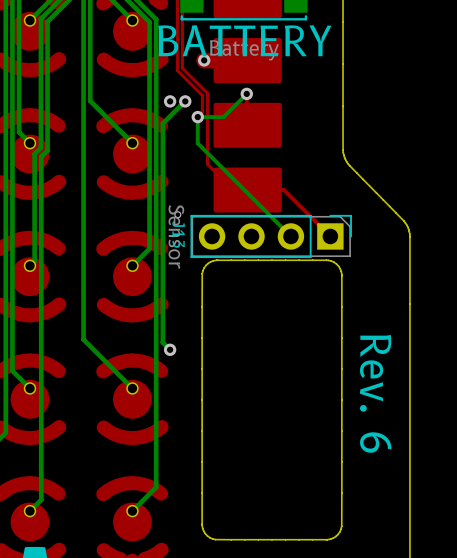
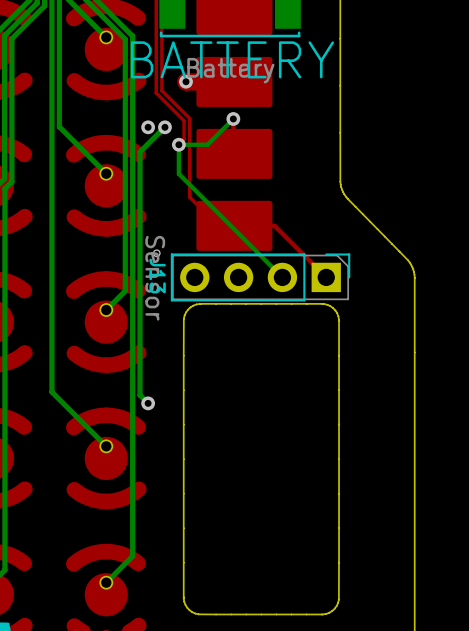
text: Rev. 6 (375, 393) -> none

